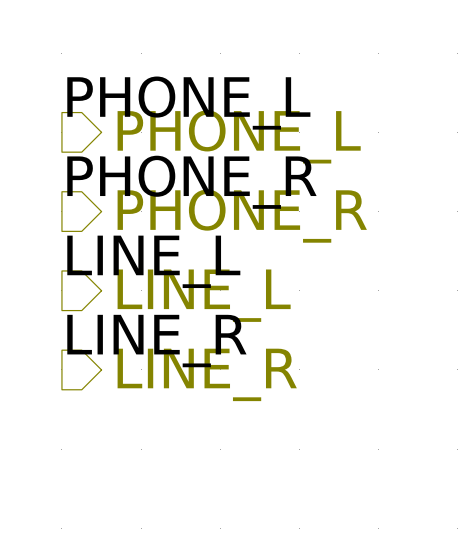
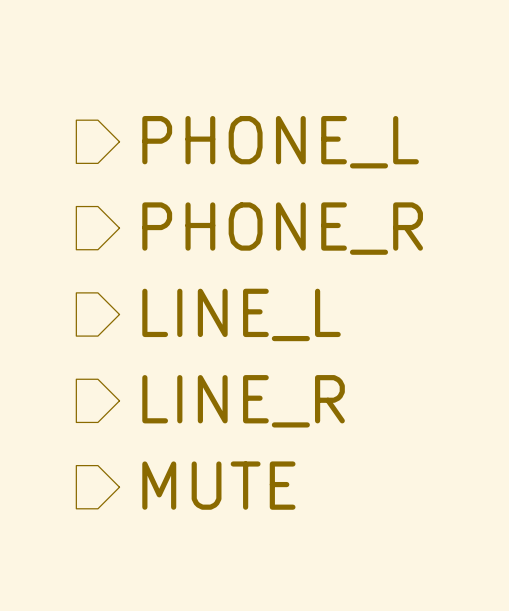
label: PHONE_L (188, 103) -> none
label: PHONE_R (191, 182) -> none
label: LINE_L (153, 261) -> none
label: LINE_R (156, 341) -> none
hierarchical label: none -> MUTE (218, 485)

